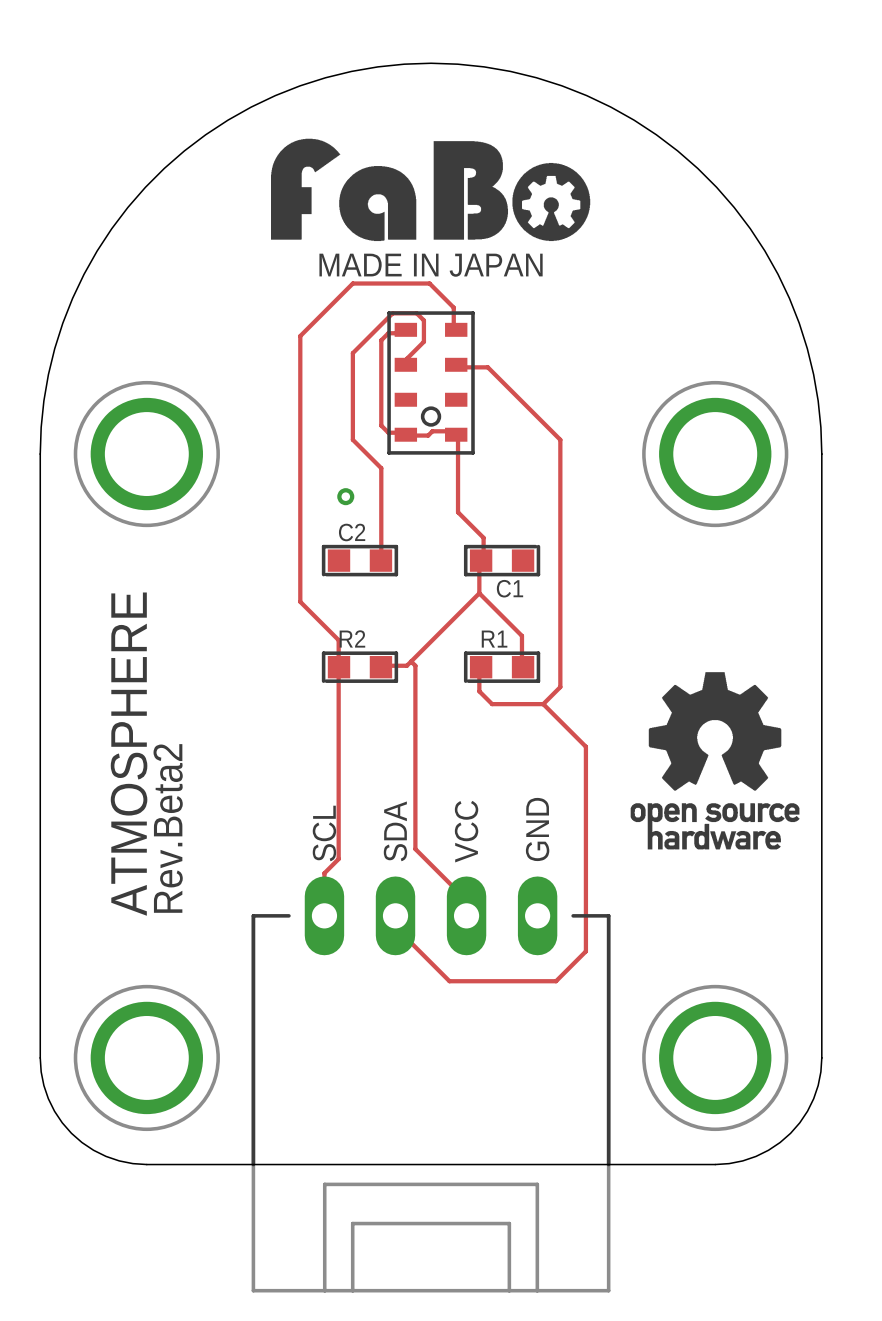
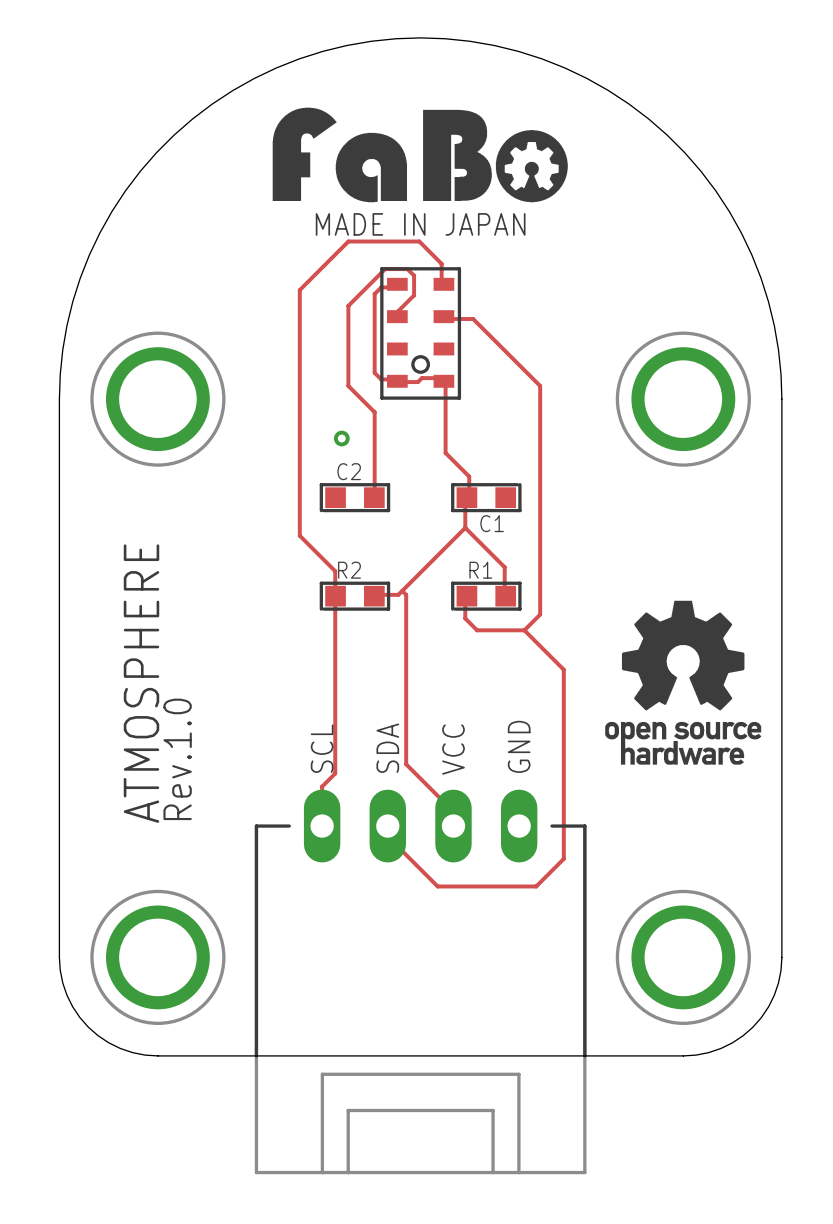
text: Rev.Beta2 (168, 828) -> Rev.1.0 (177, 759)

